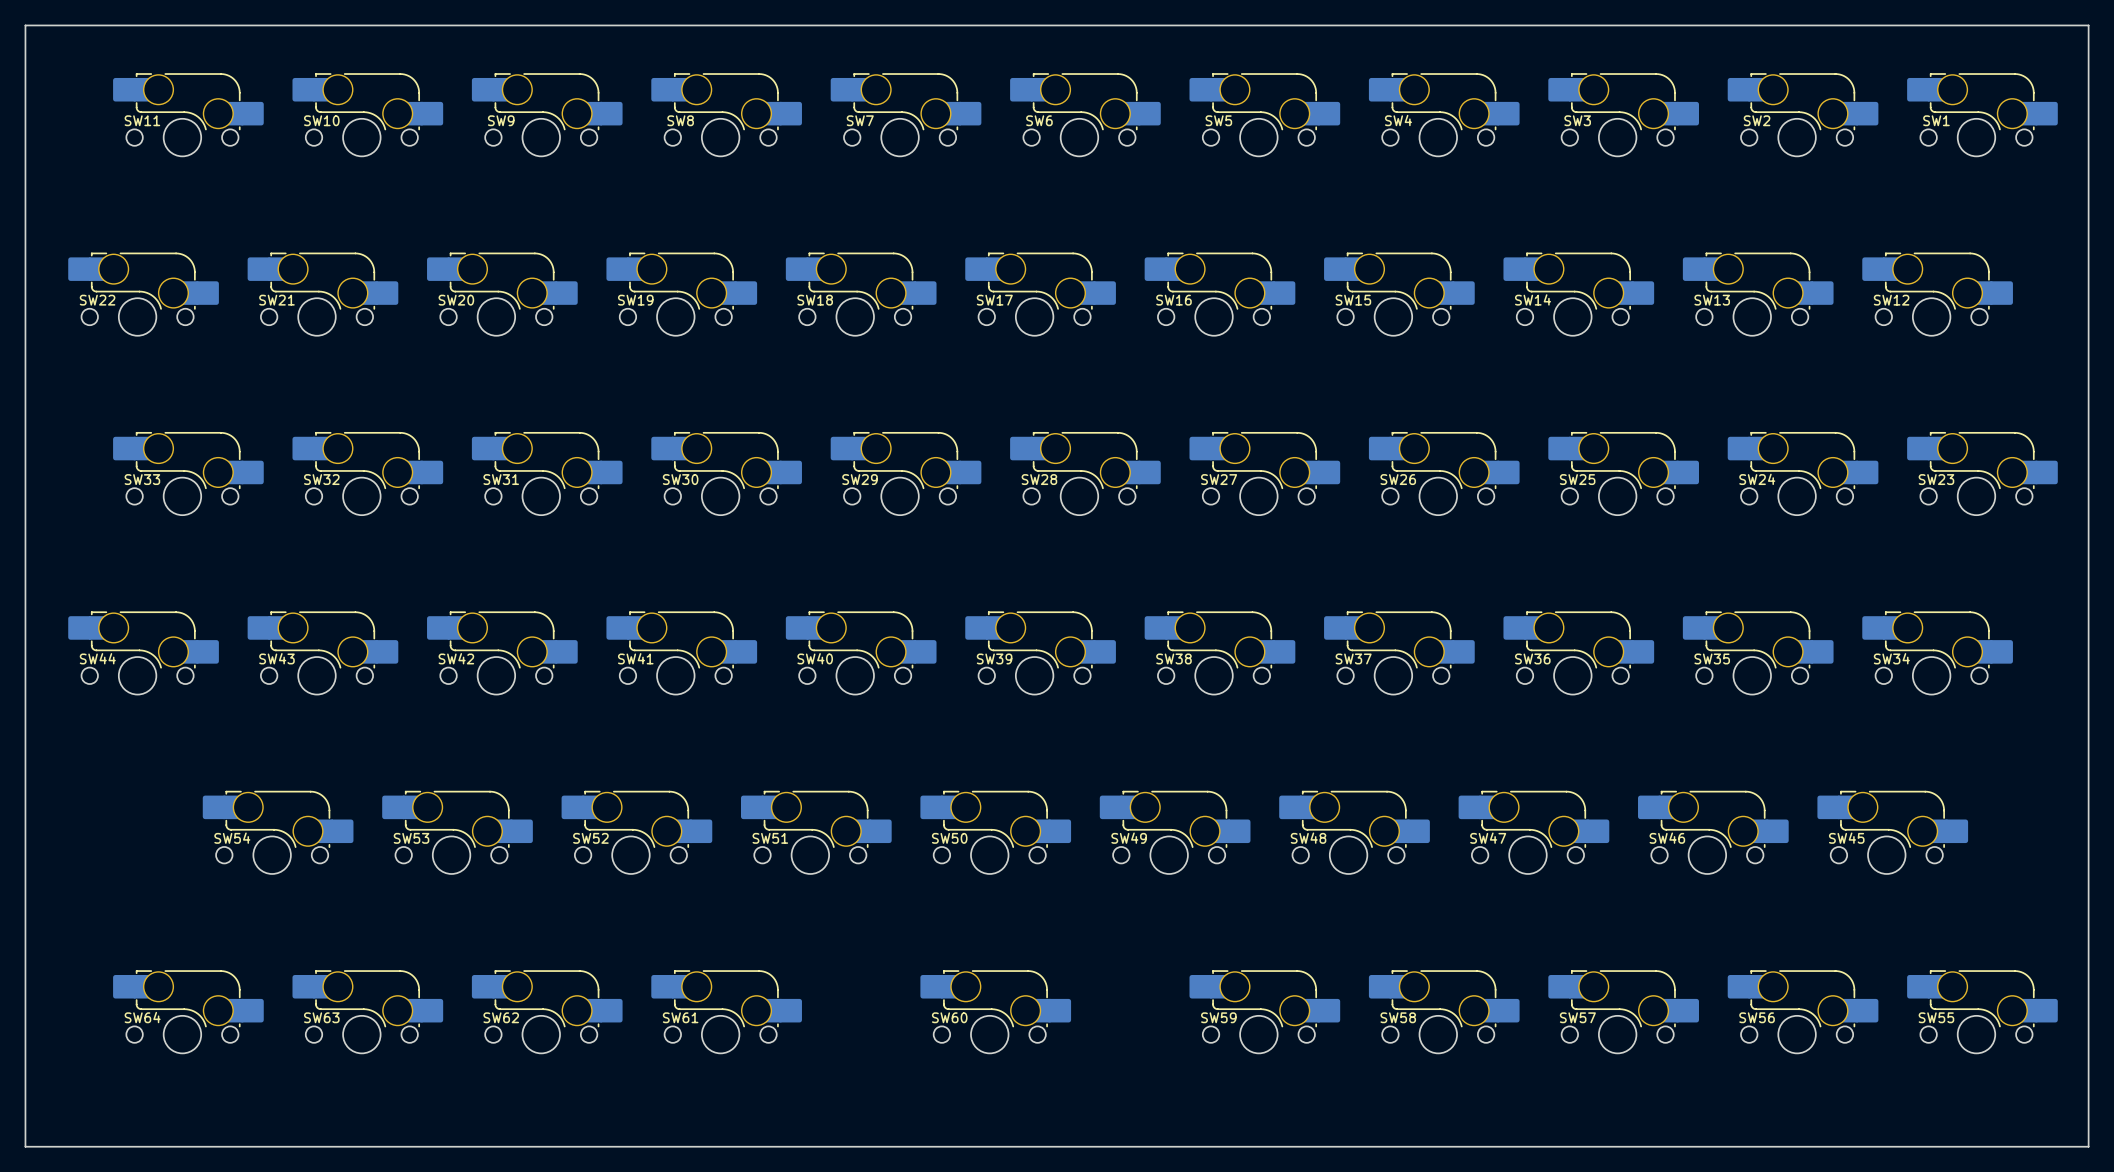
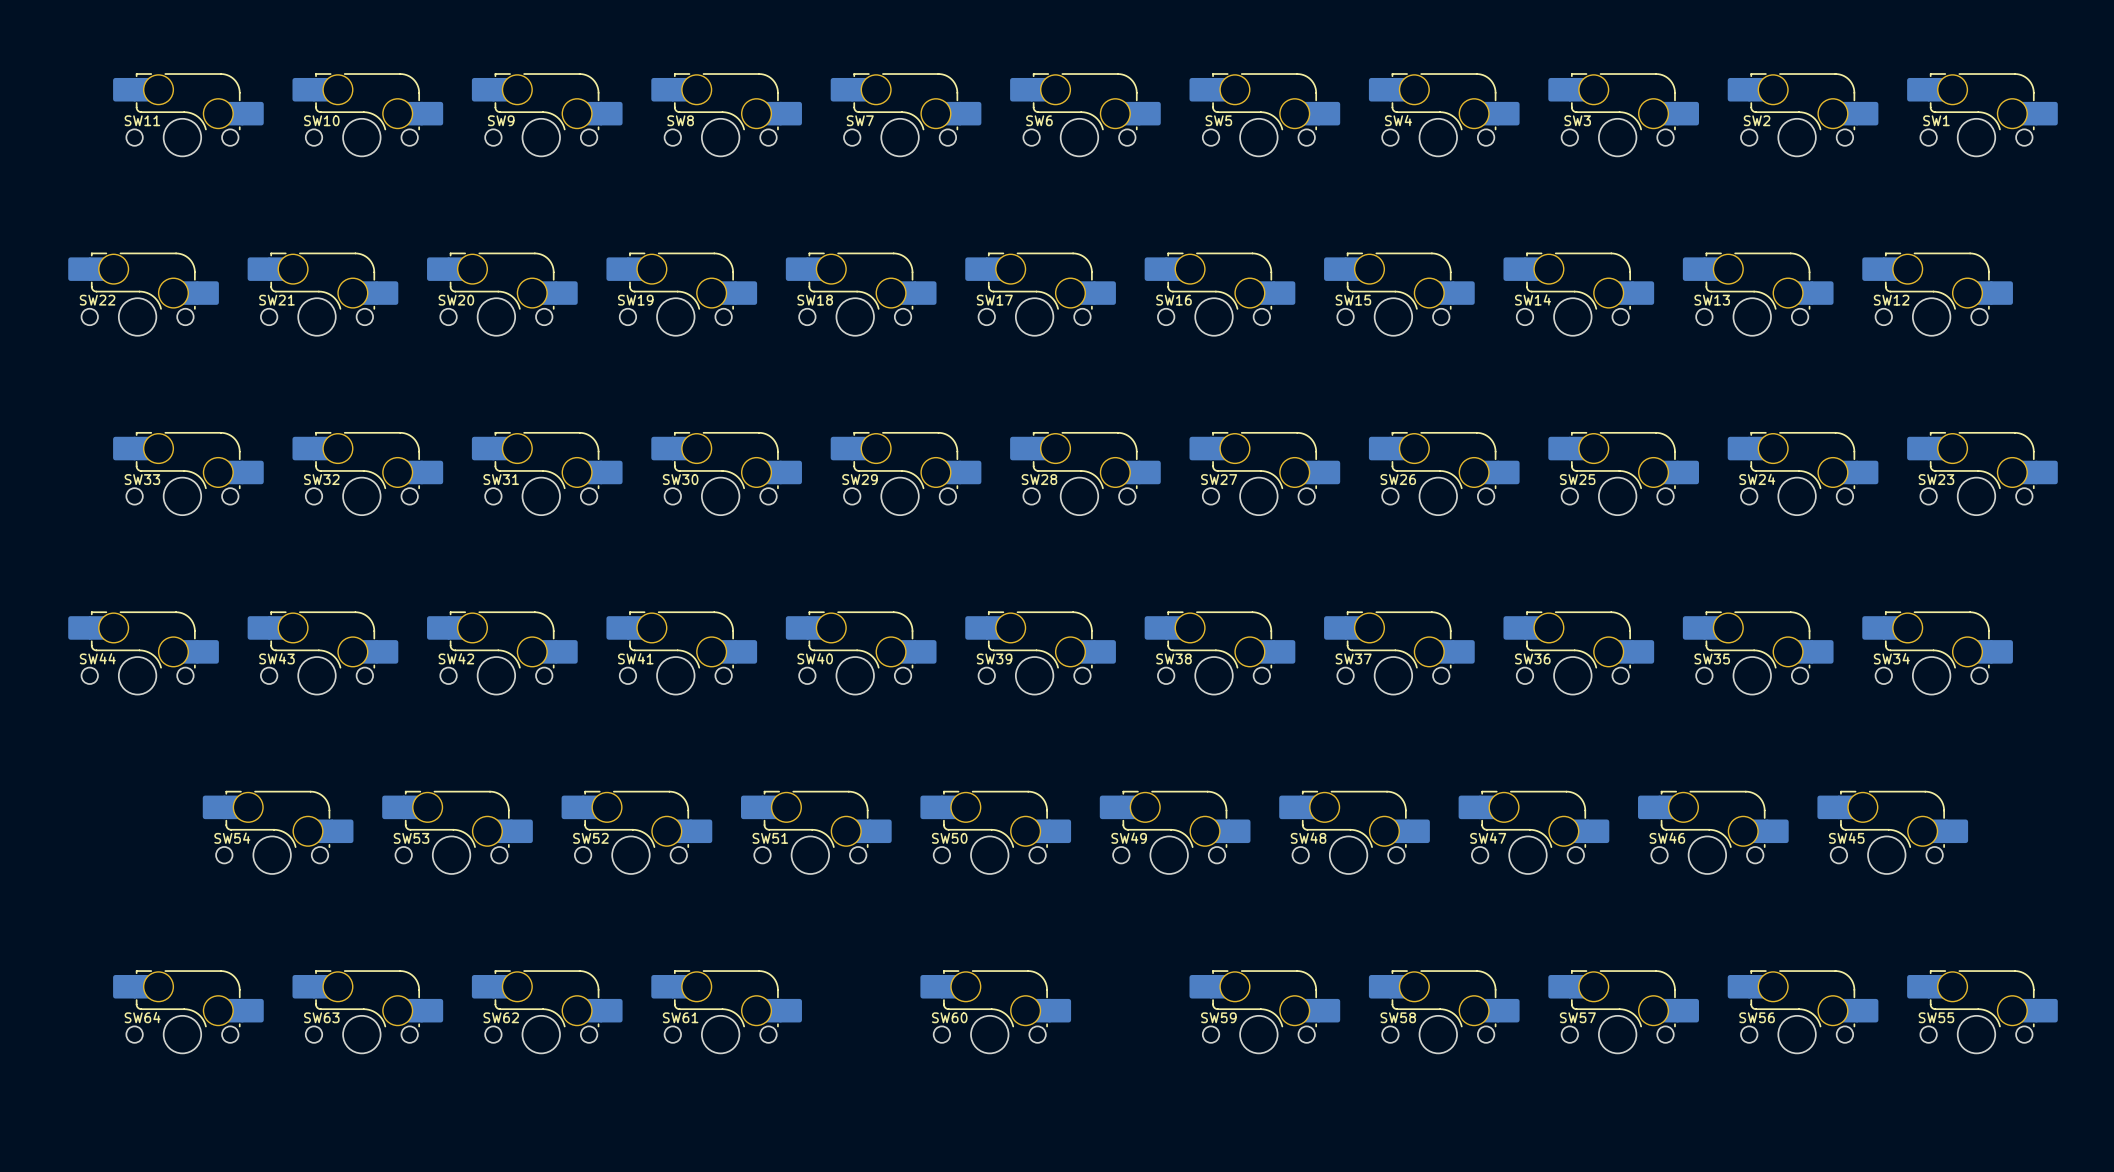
board edge: (2088, 25) (2088, 1146) (25, 1146) (25, 25) (2088, 25) -> none

